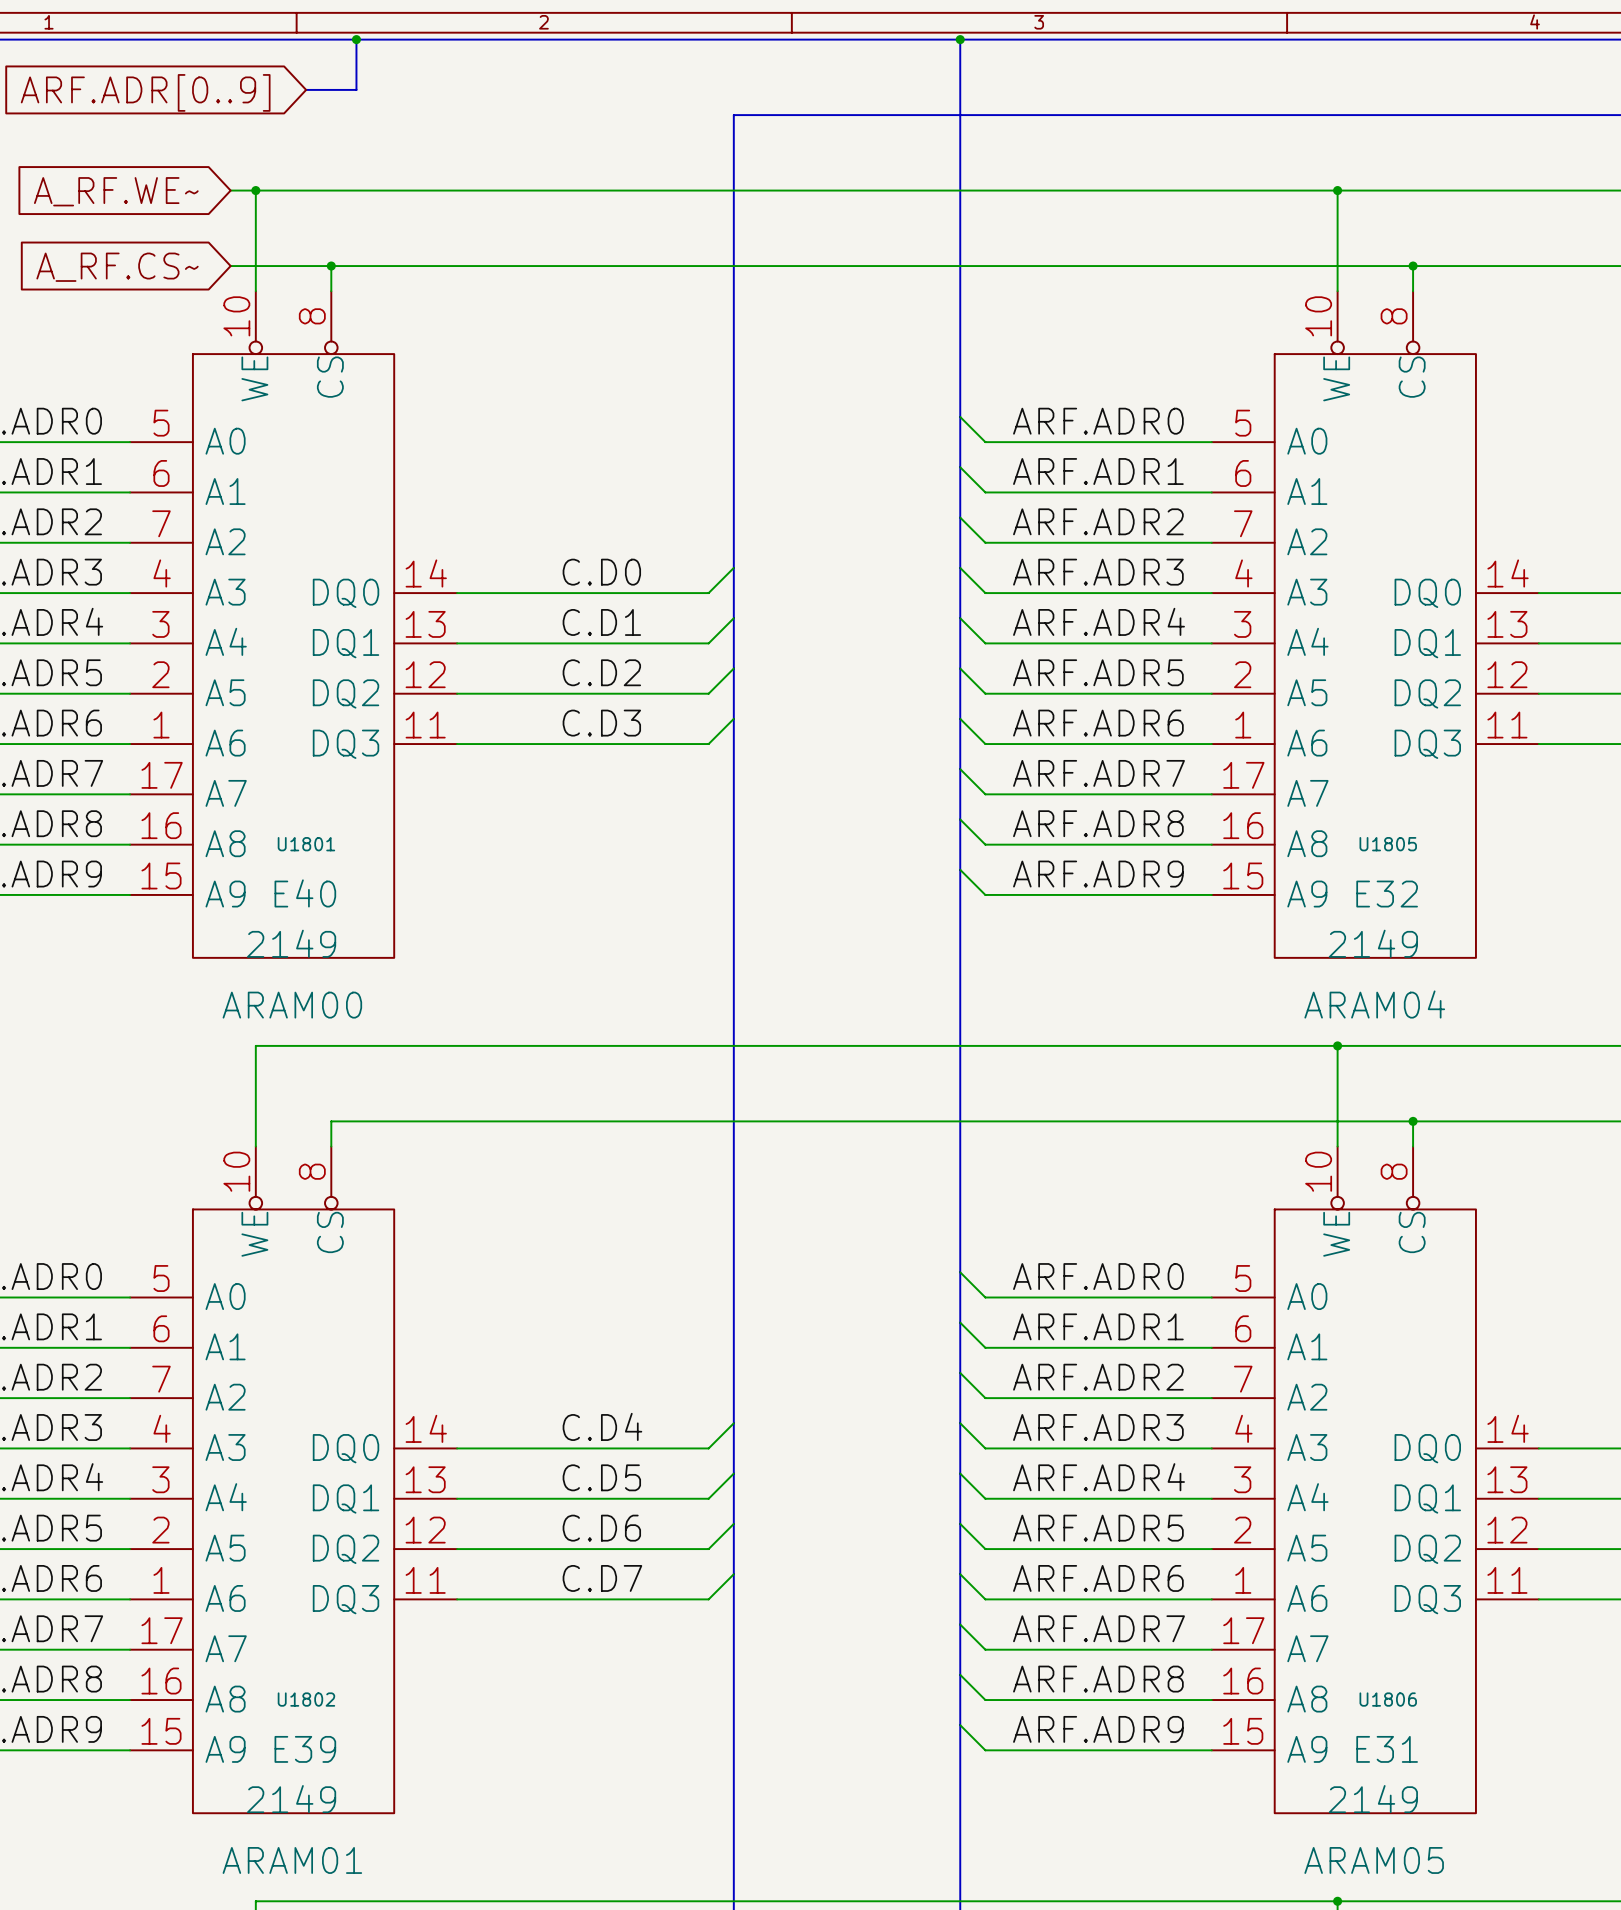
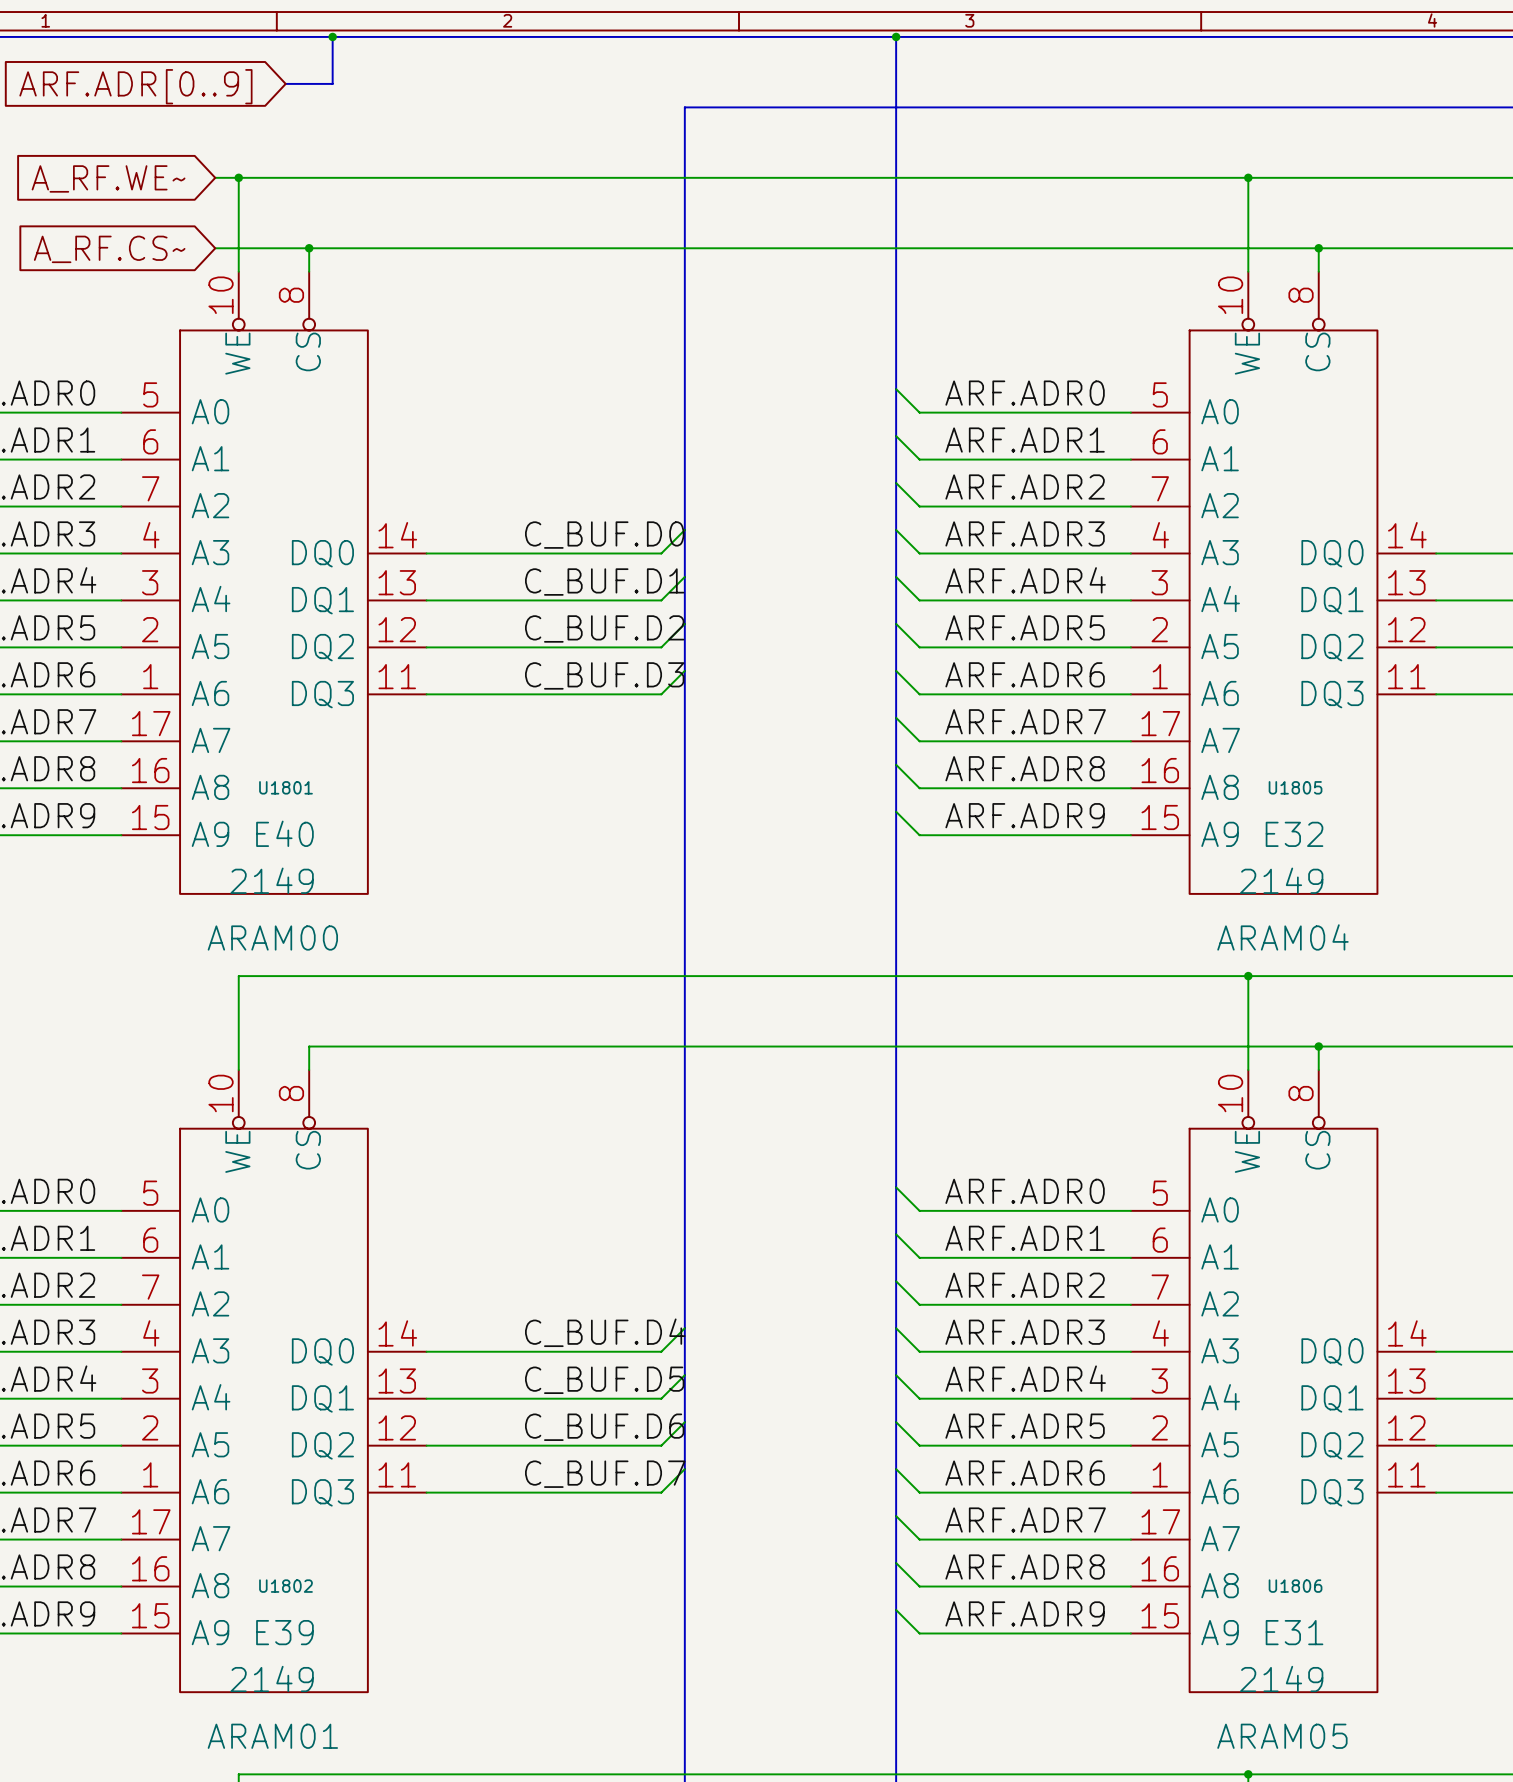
label: C.D0 (601, 572) -> C_BUF.D0 (604, 535)
label: C.D1 (601, 622) -> C_BUF.D1 (604, 582)
label: C.D2 (601, 672) -> C_BUF.D2 (604, 628)
label: C.D3 (601, 723) -> C_BUF.D3 (604, 675)
label: C.D4 (602, 1426) -> C_BUF.D4 (605, 1332)
label: C.D5 (601, 1477) -> C_BUF.D5 (604, 1380)
label: C.D6 (601, 1528) -> C_BUF.D6 (604, 1427)
label: C.D7 (602, 1578) -> C_BUF.D7 (605, 1474)

